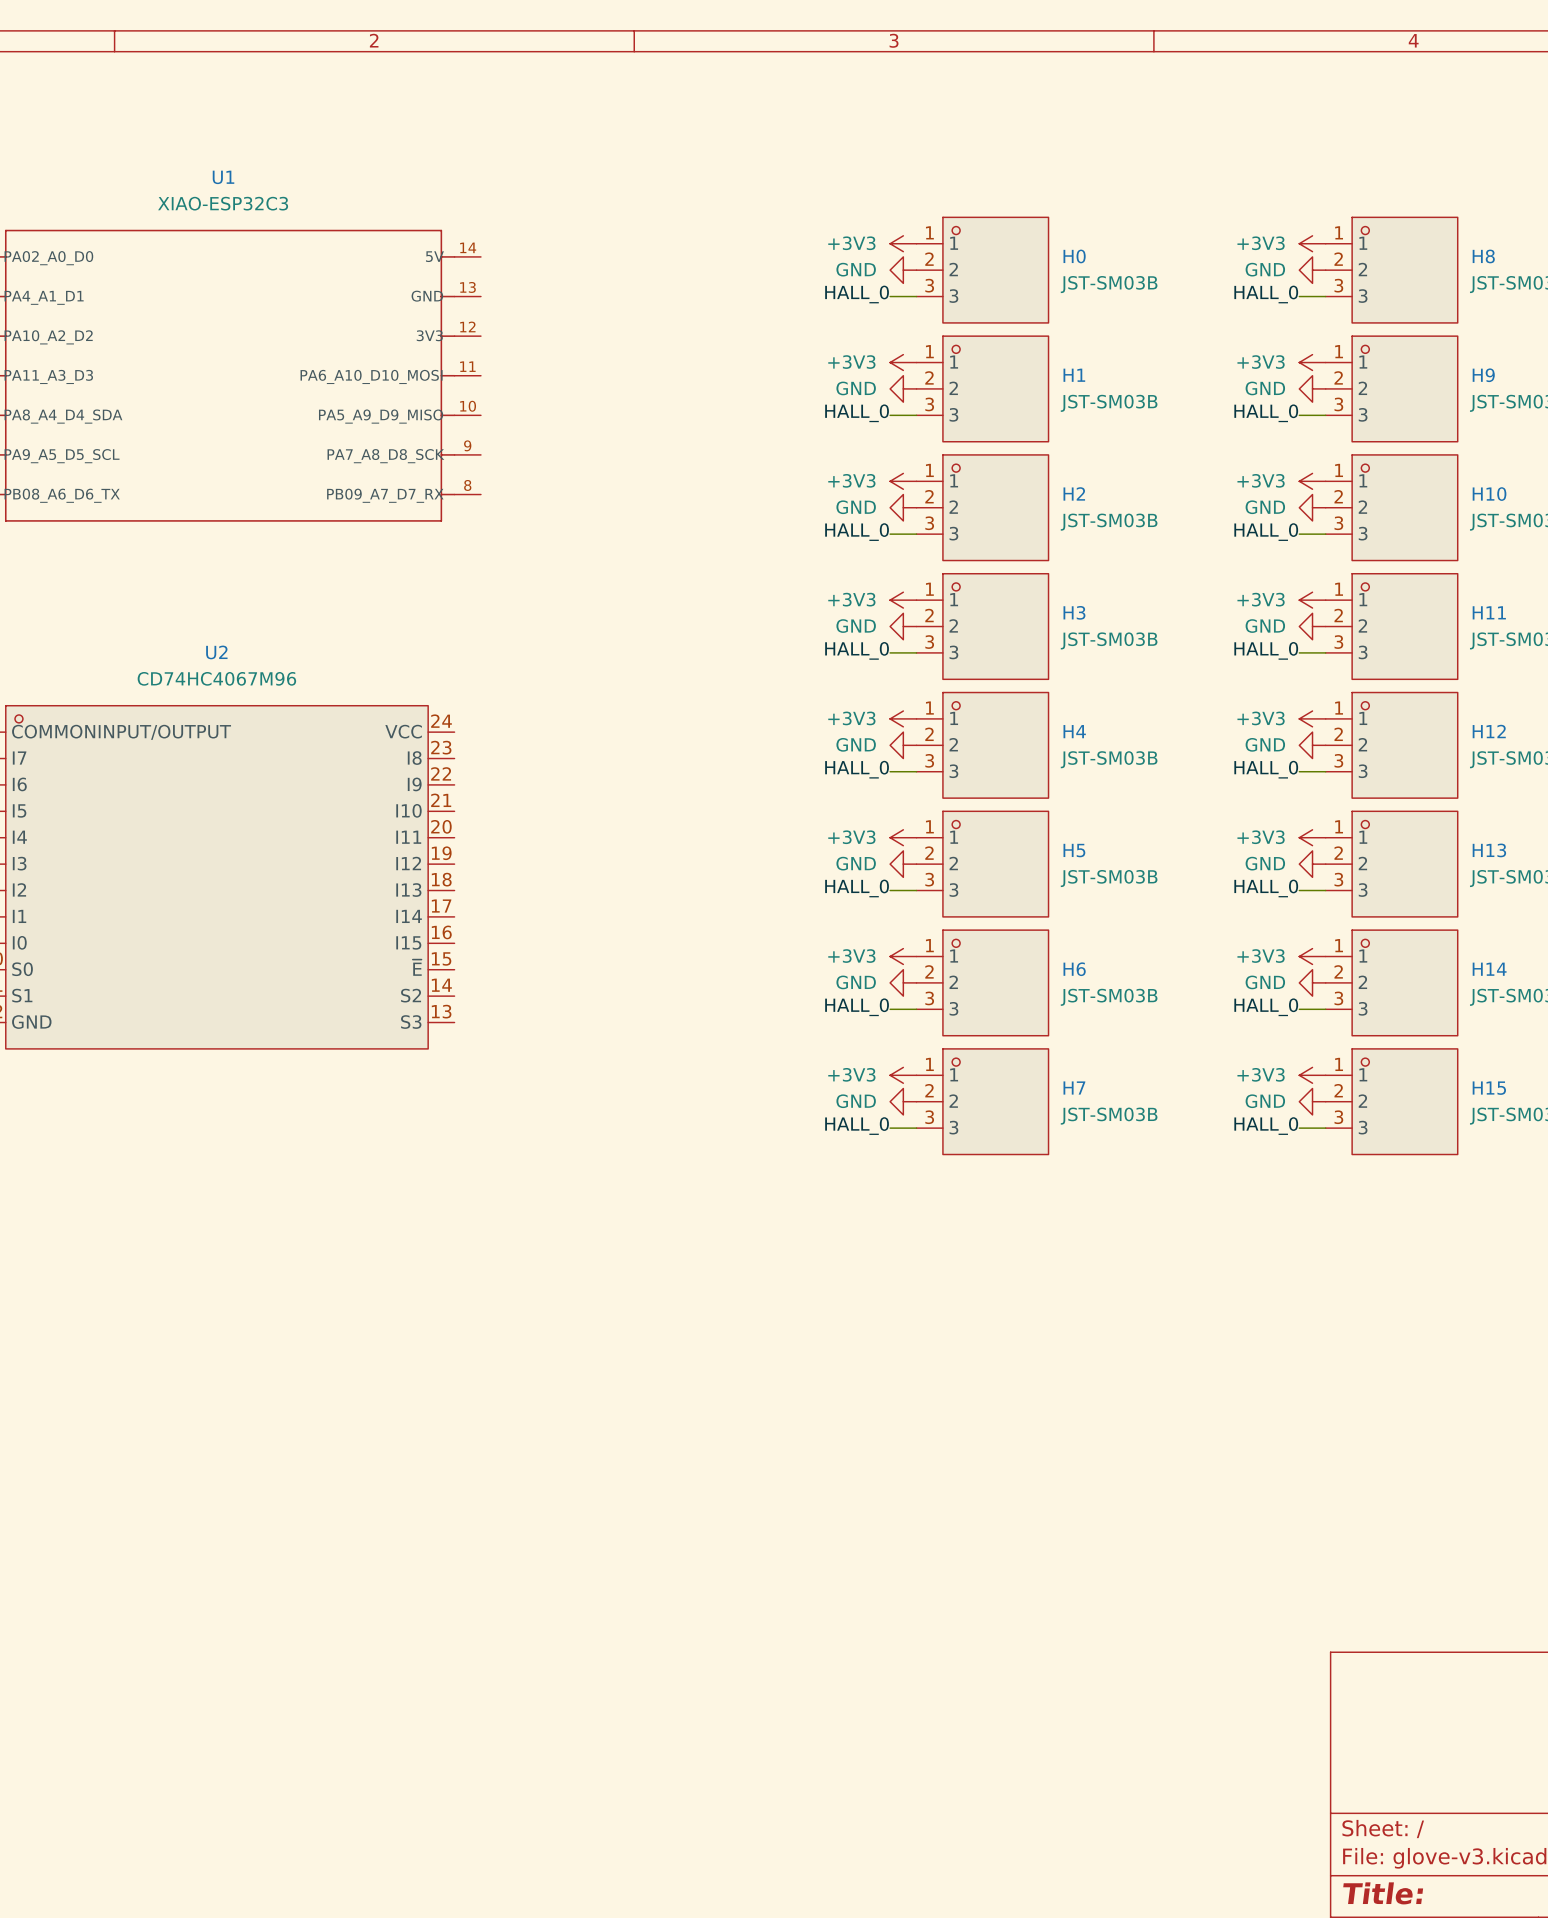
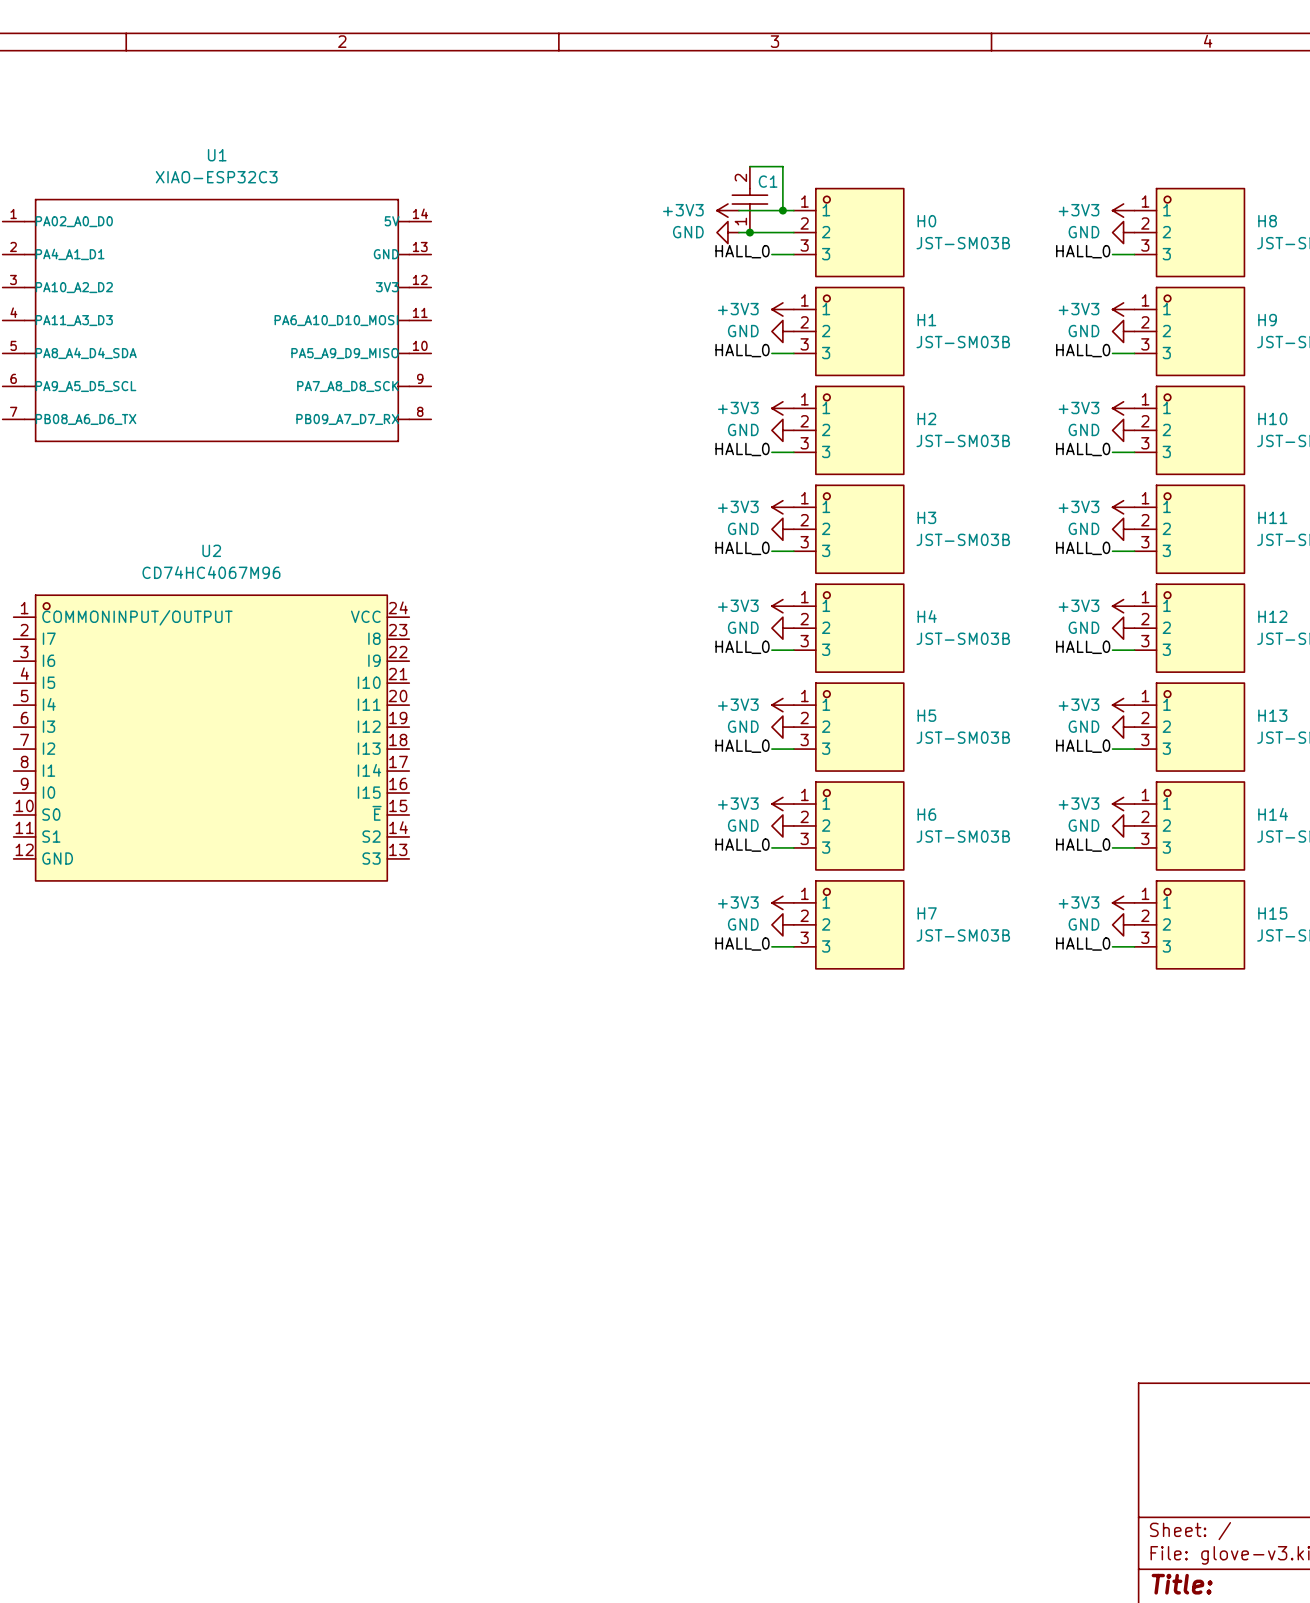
wire: none -> (749, 166) (782, 166) (782, 210)
C1: none -> (749, 199)
wire: none -> (738, 210) (793, 210)
power symbol position: +3V3 (903, 243) -> +3V3 (727, 210)
junction: none -> (782, 210)
wire: none -> (738, 232) (793, 232)
junction: none -> (749, 232)
power symbol position: GND (903, 270) -> GND (727, 232)

